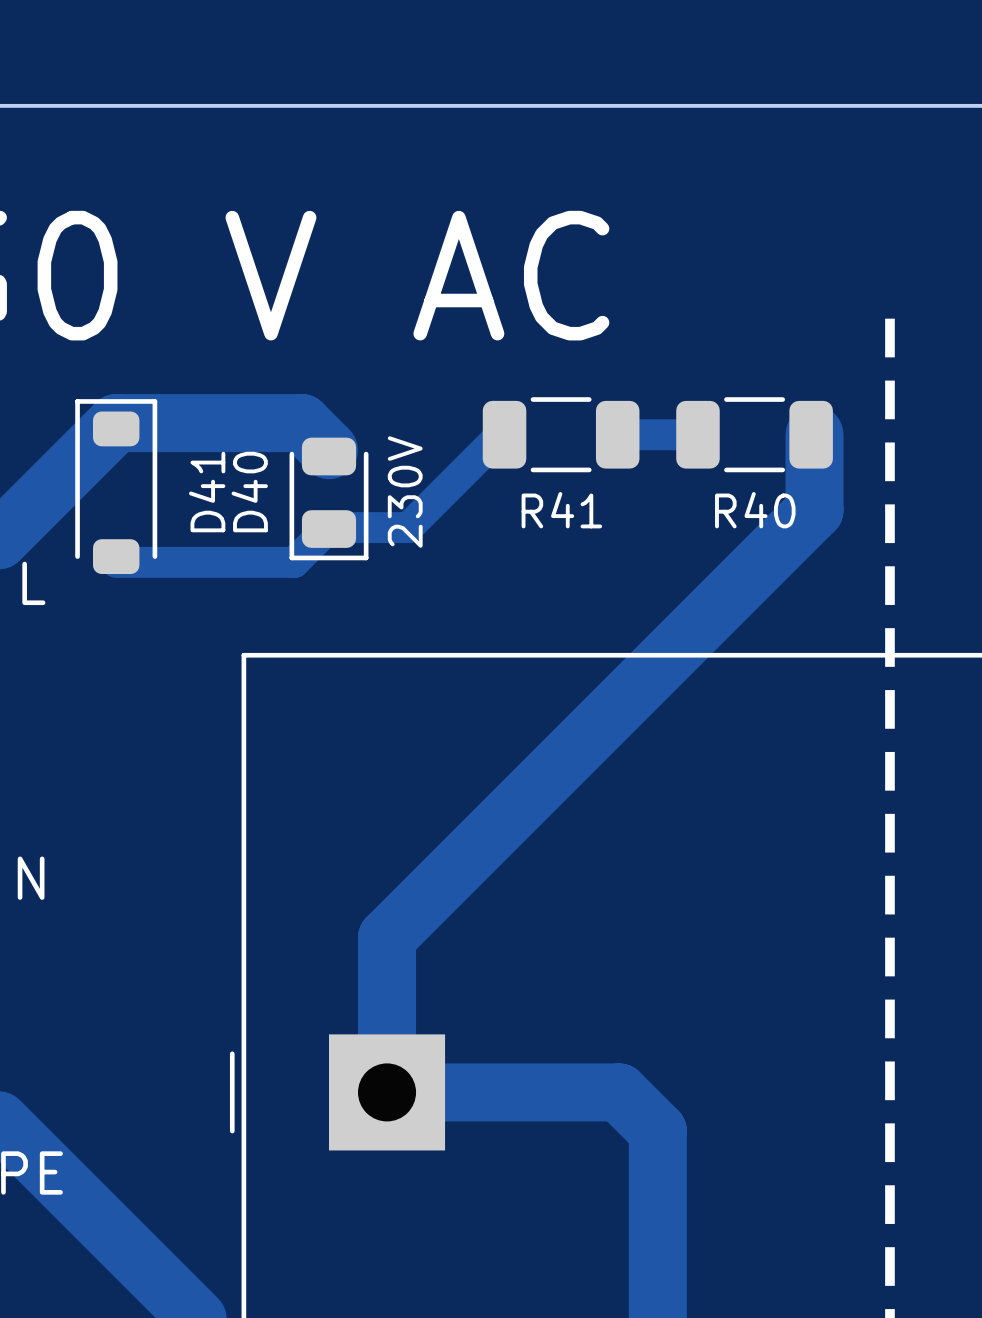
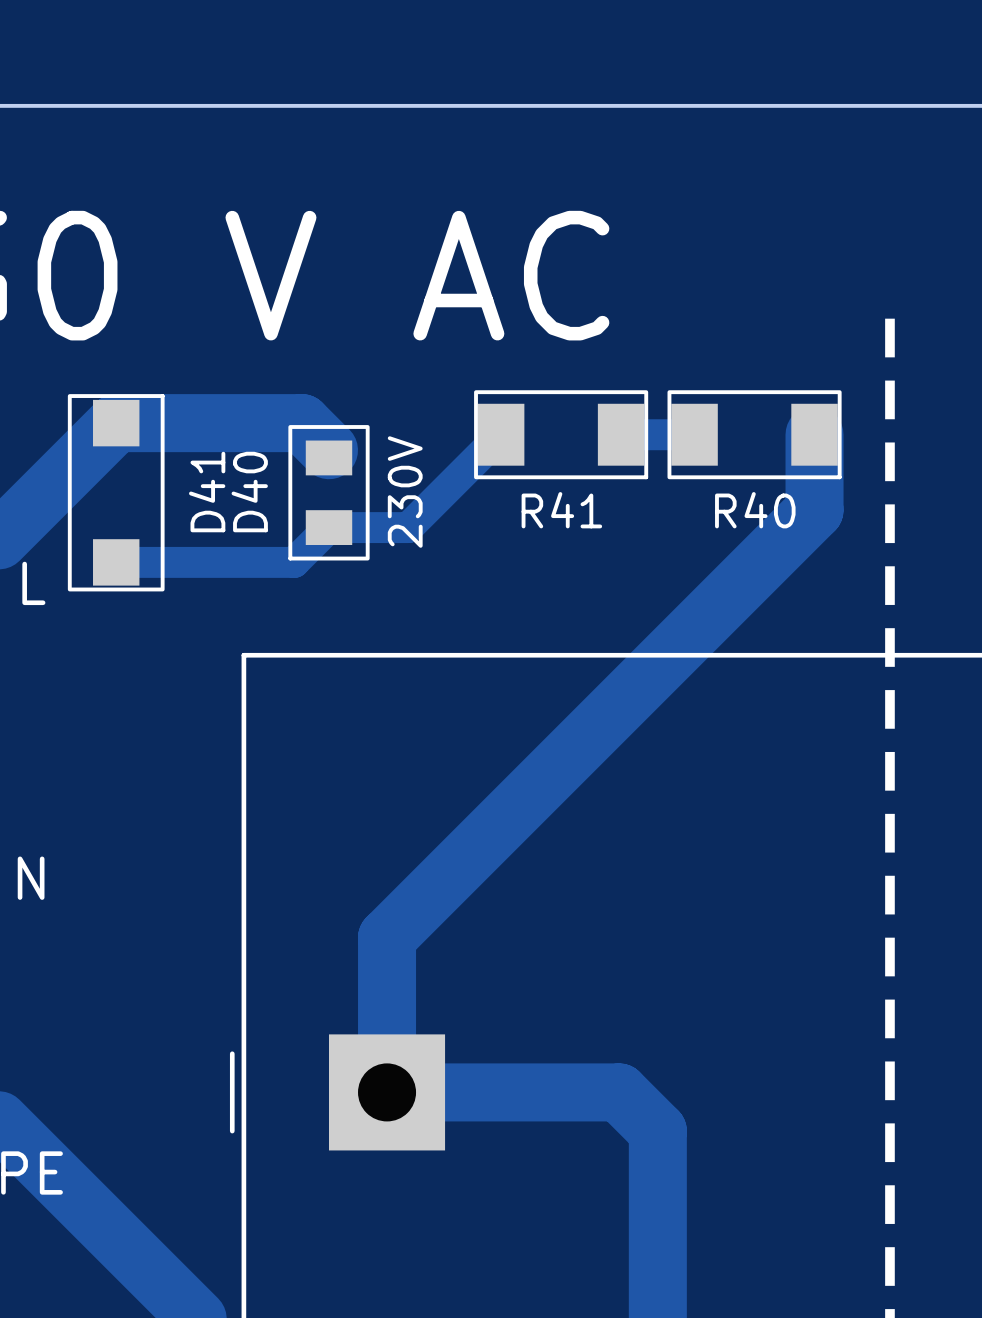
R41 footprint: [482, 397, 640, 473] -> [474, 390, 649, 480]
R40 footprint: [676, 397, 833, 473] -> [667, 390, 842, 480]
D41 footprint: [75, 399, 158, 575] -> [67, 394, 165, 592]
D40 footprint: [289, 437, 369, 561] -> [288, 425, 370, 561]

